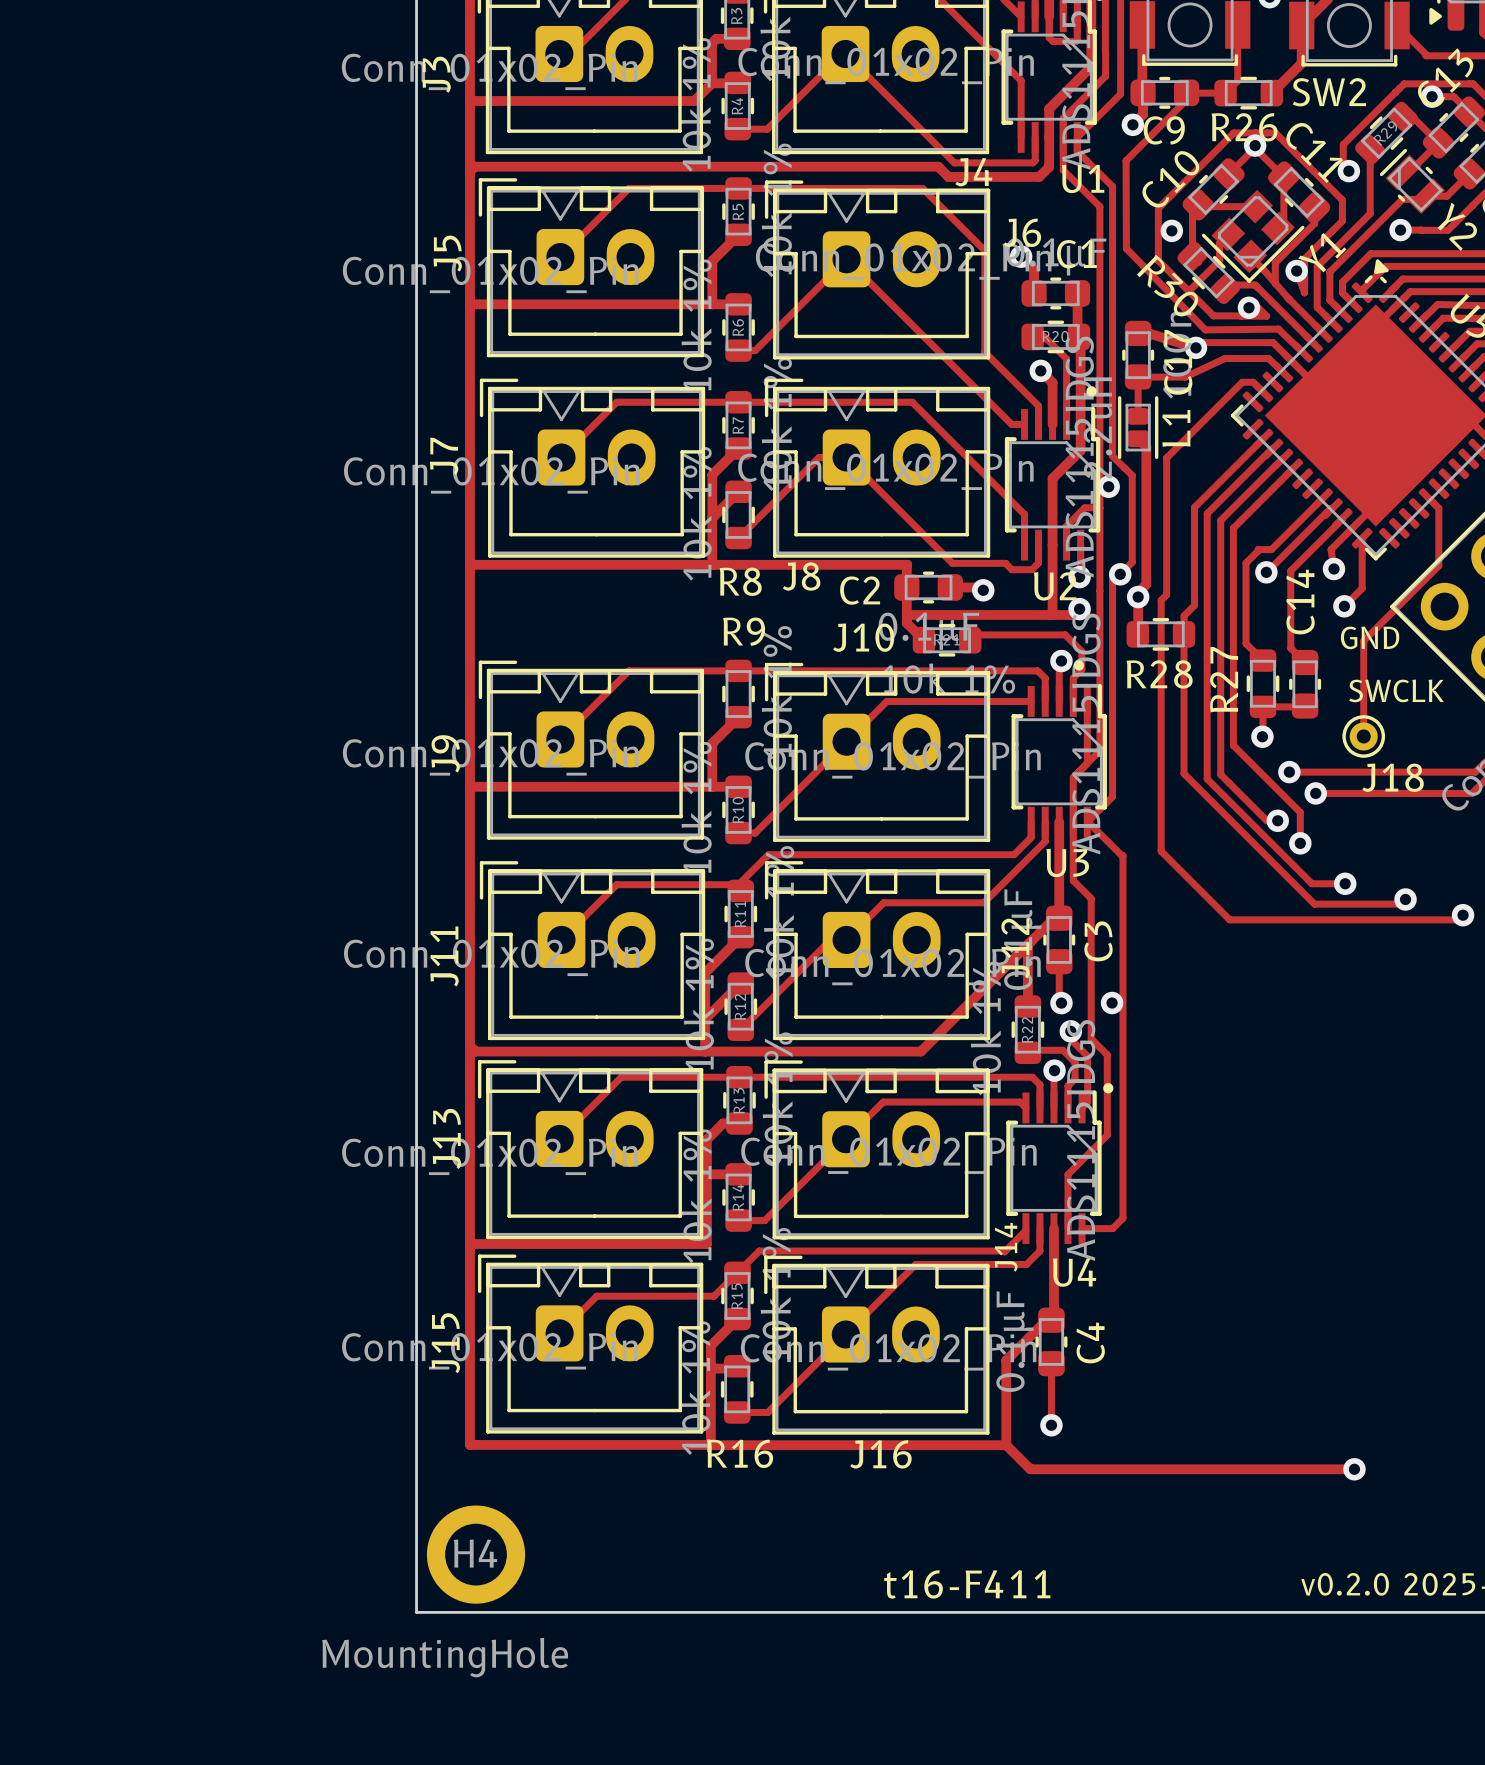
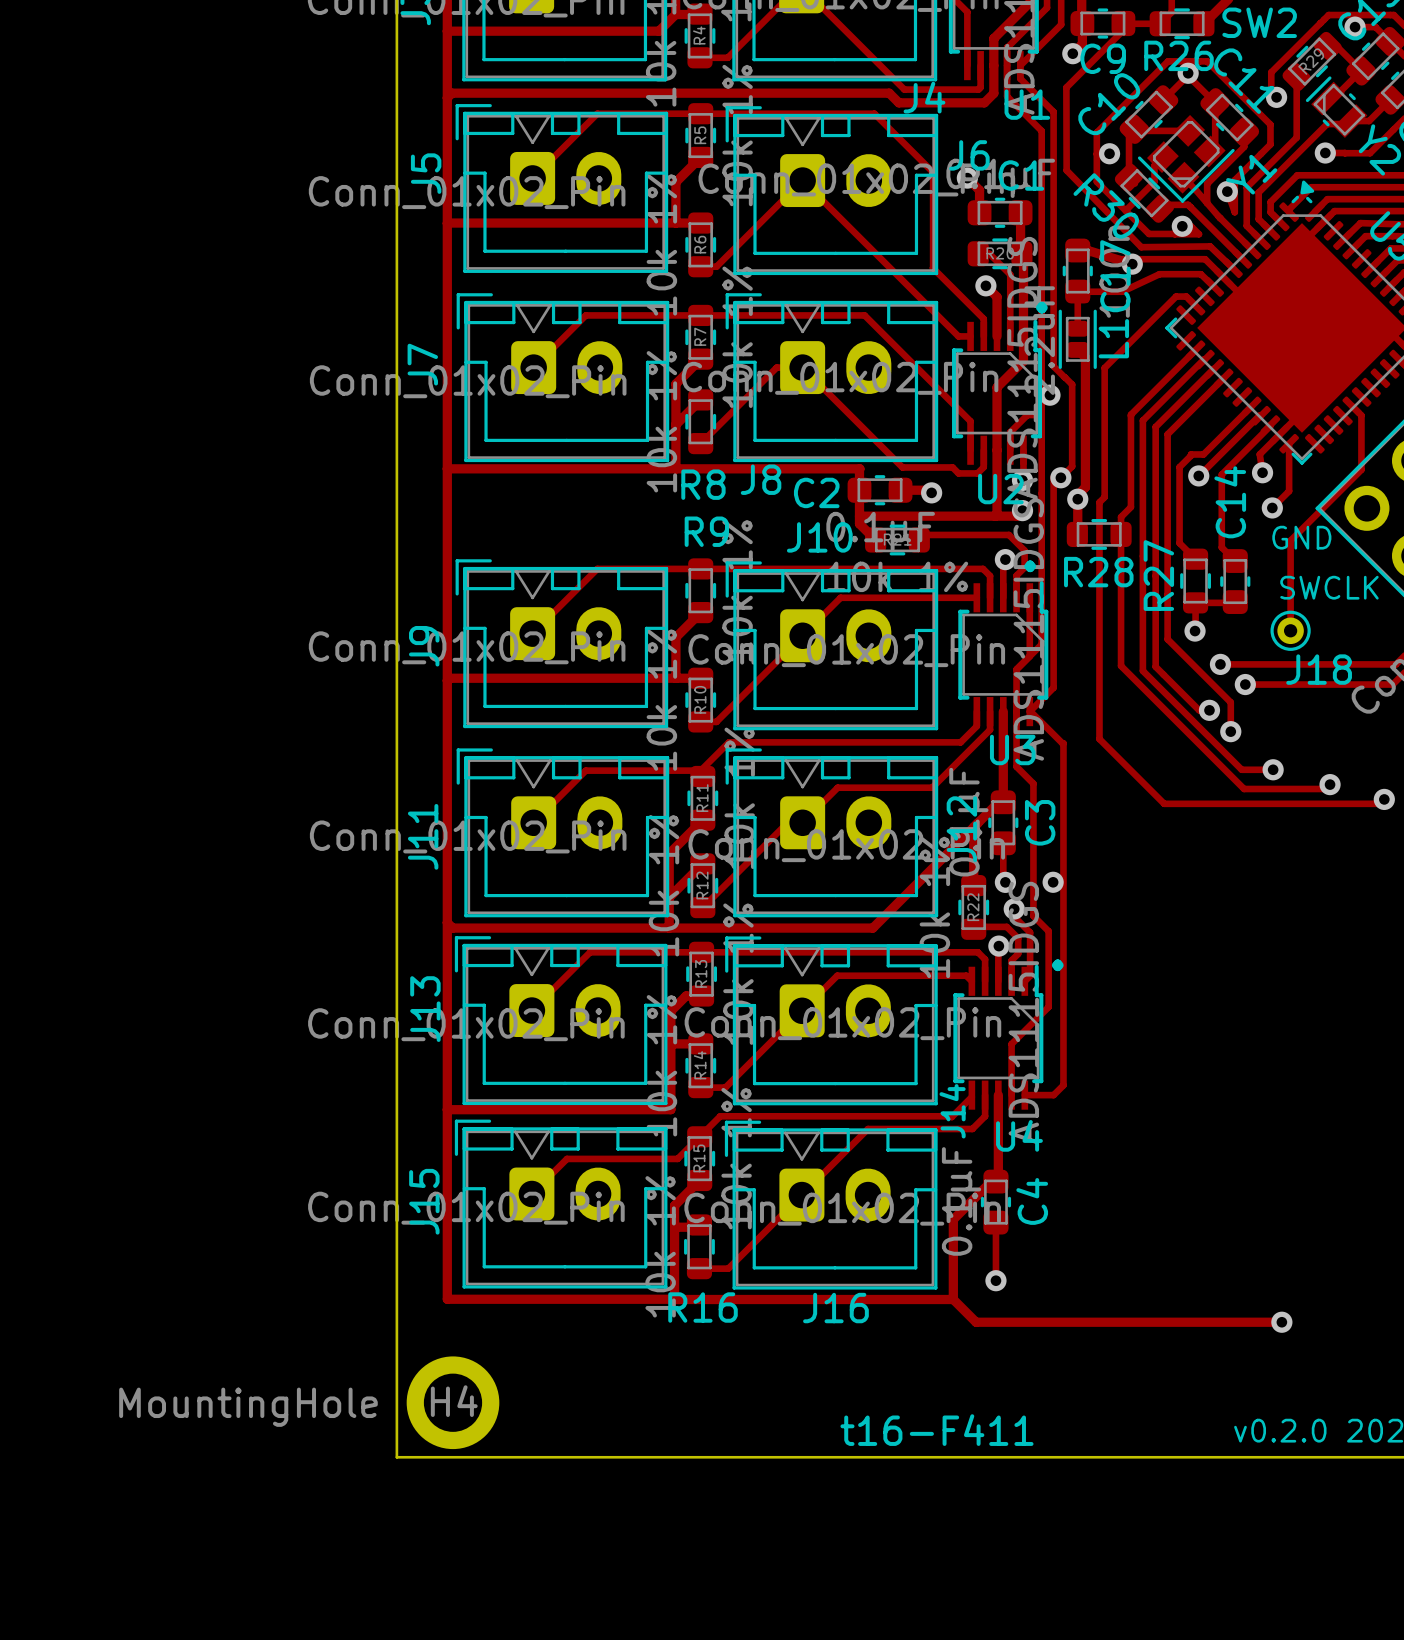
H4 value position: MountingHole (445, 1657) -> MountingHole (248, 1407)

